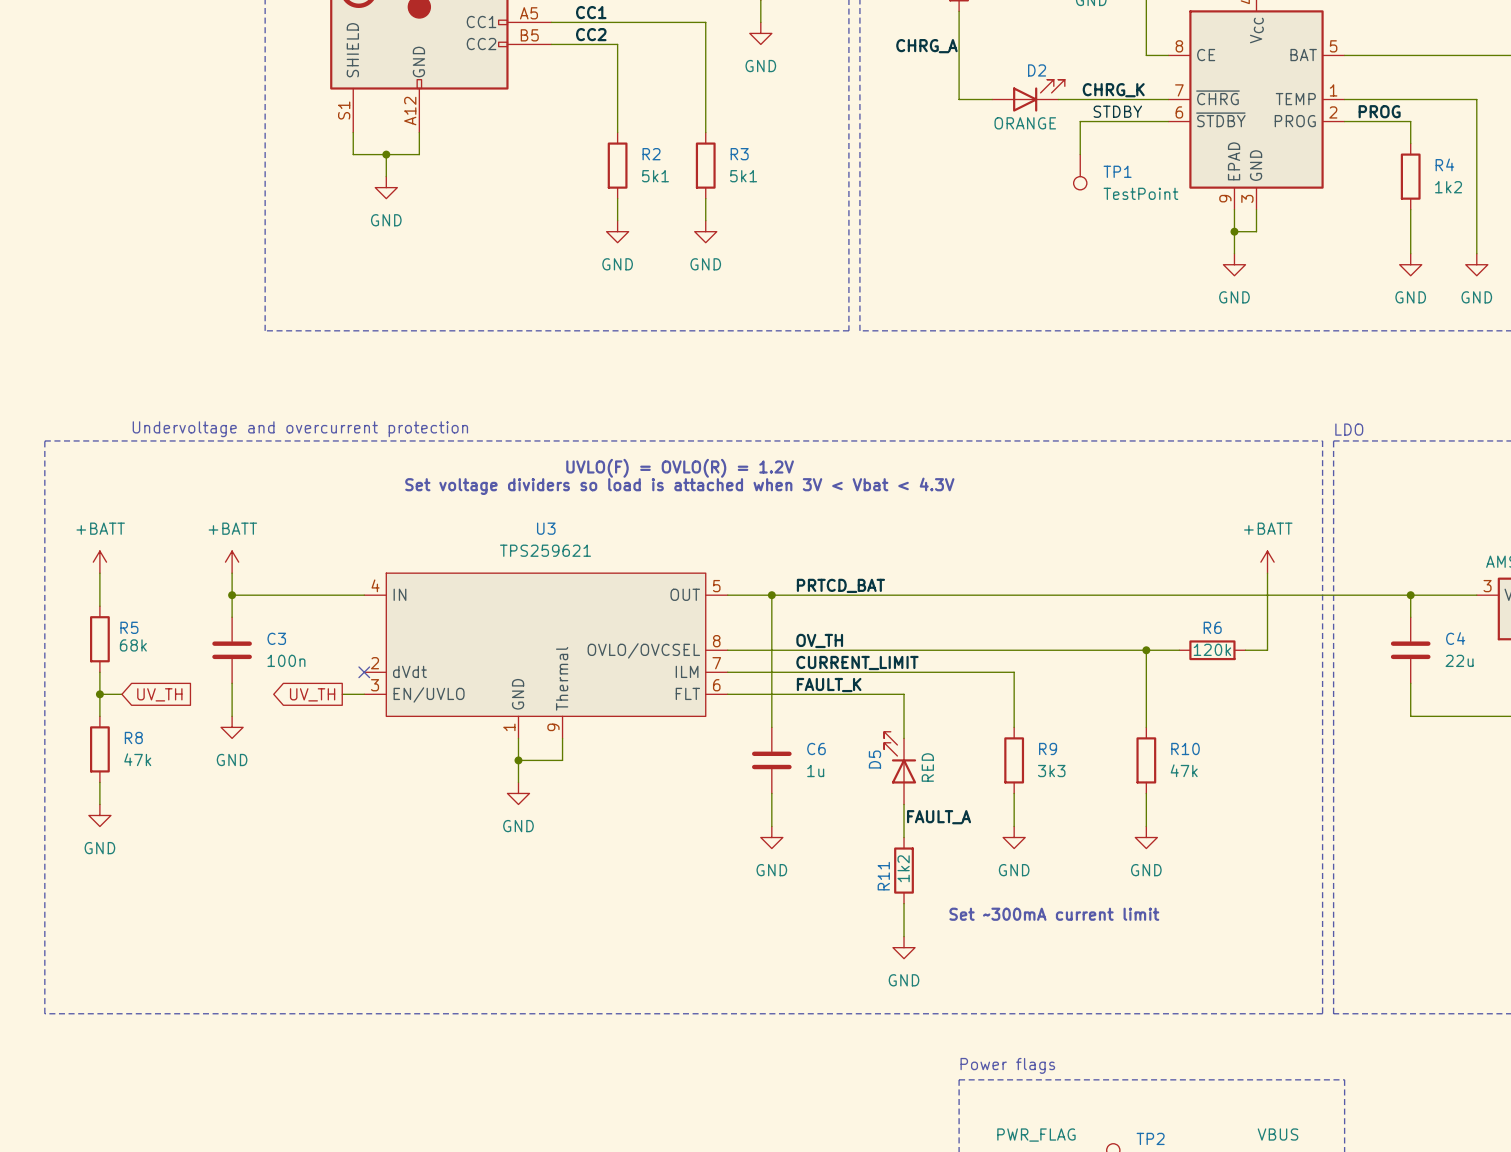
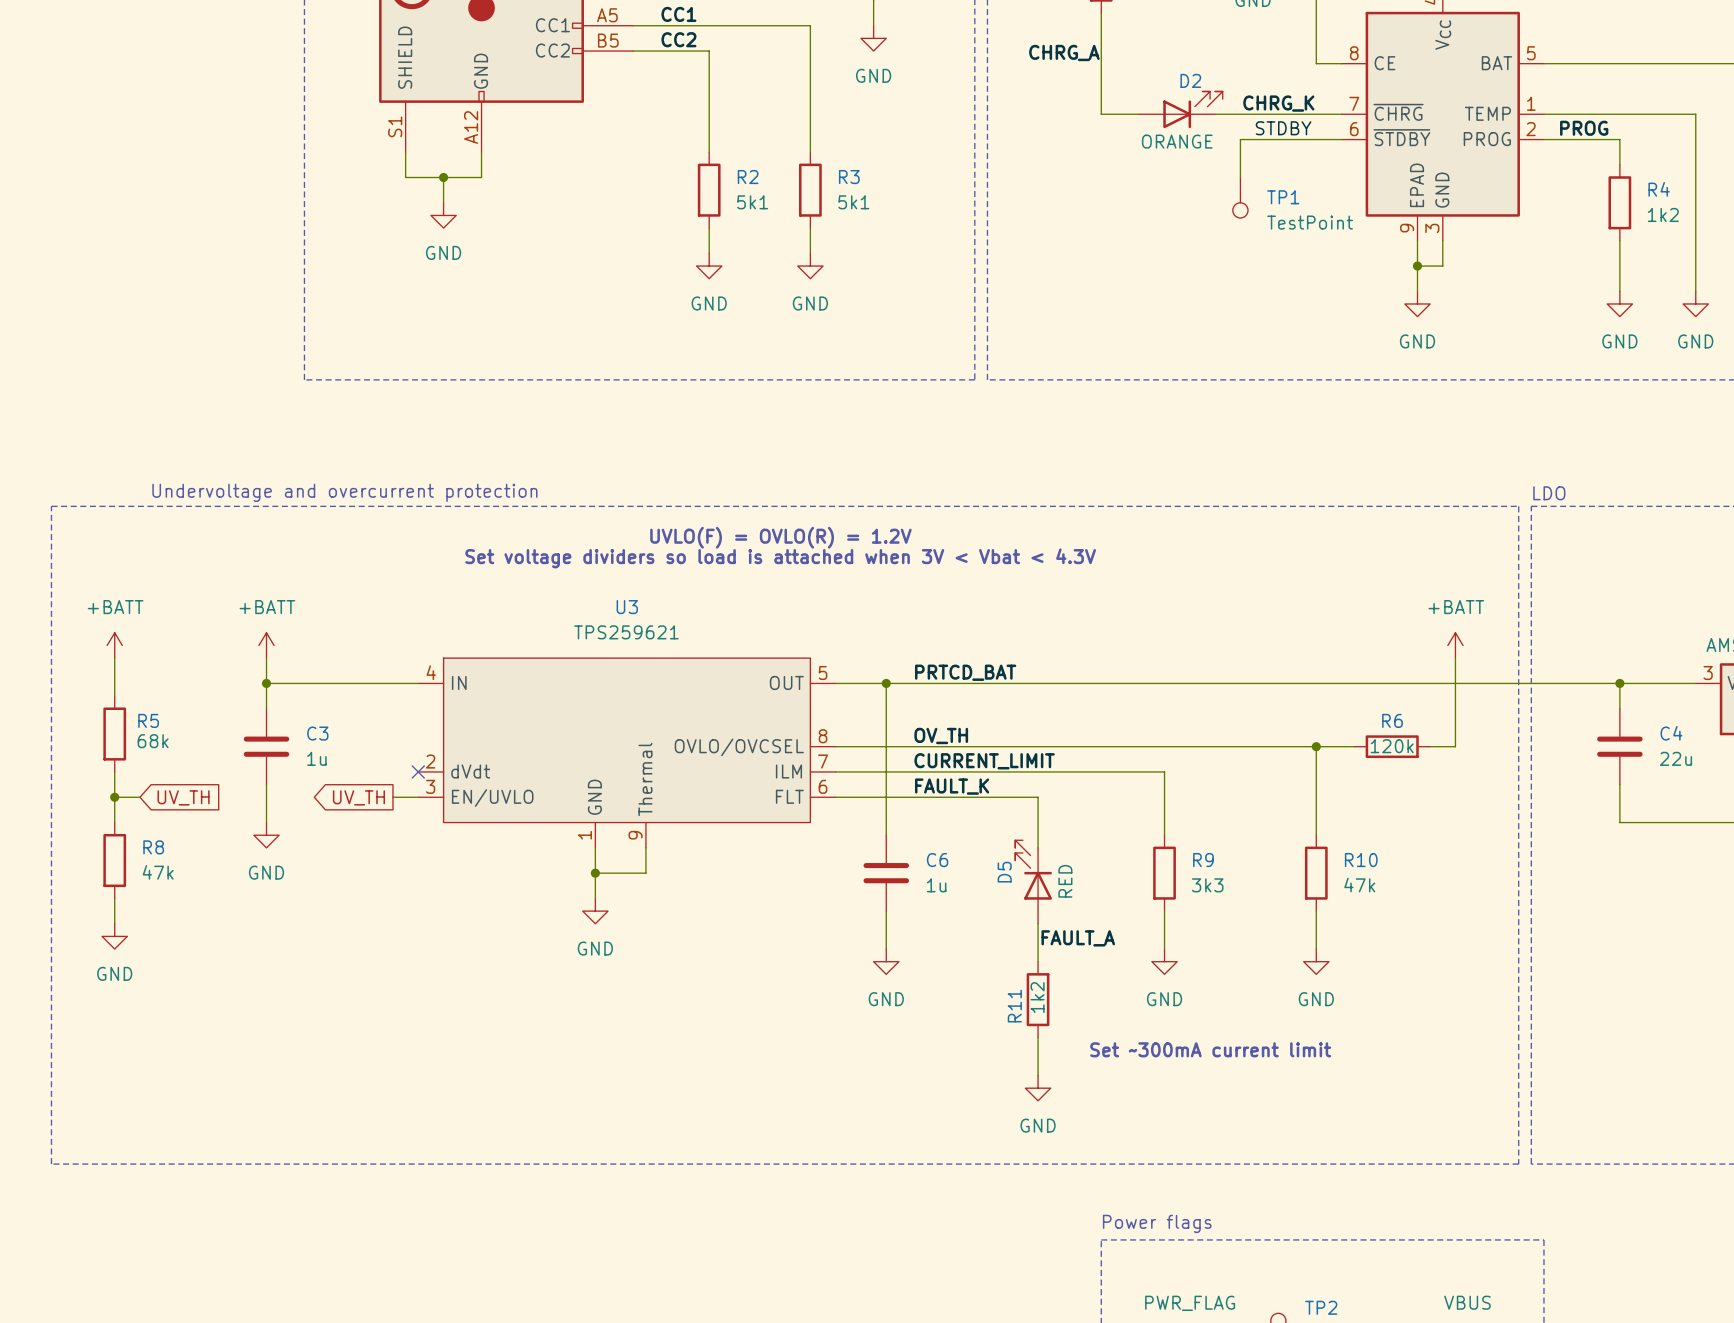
C3 value: 100n (286, 660) -> 1u (316, 758)

